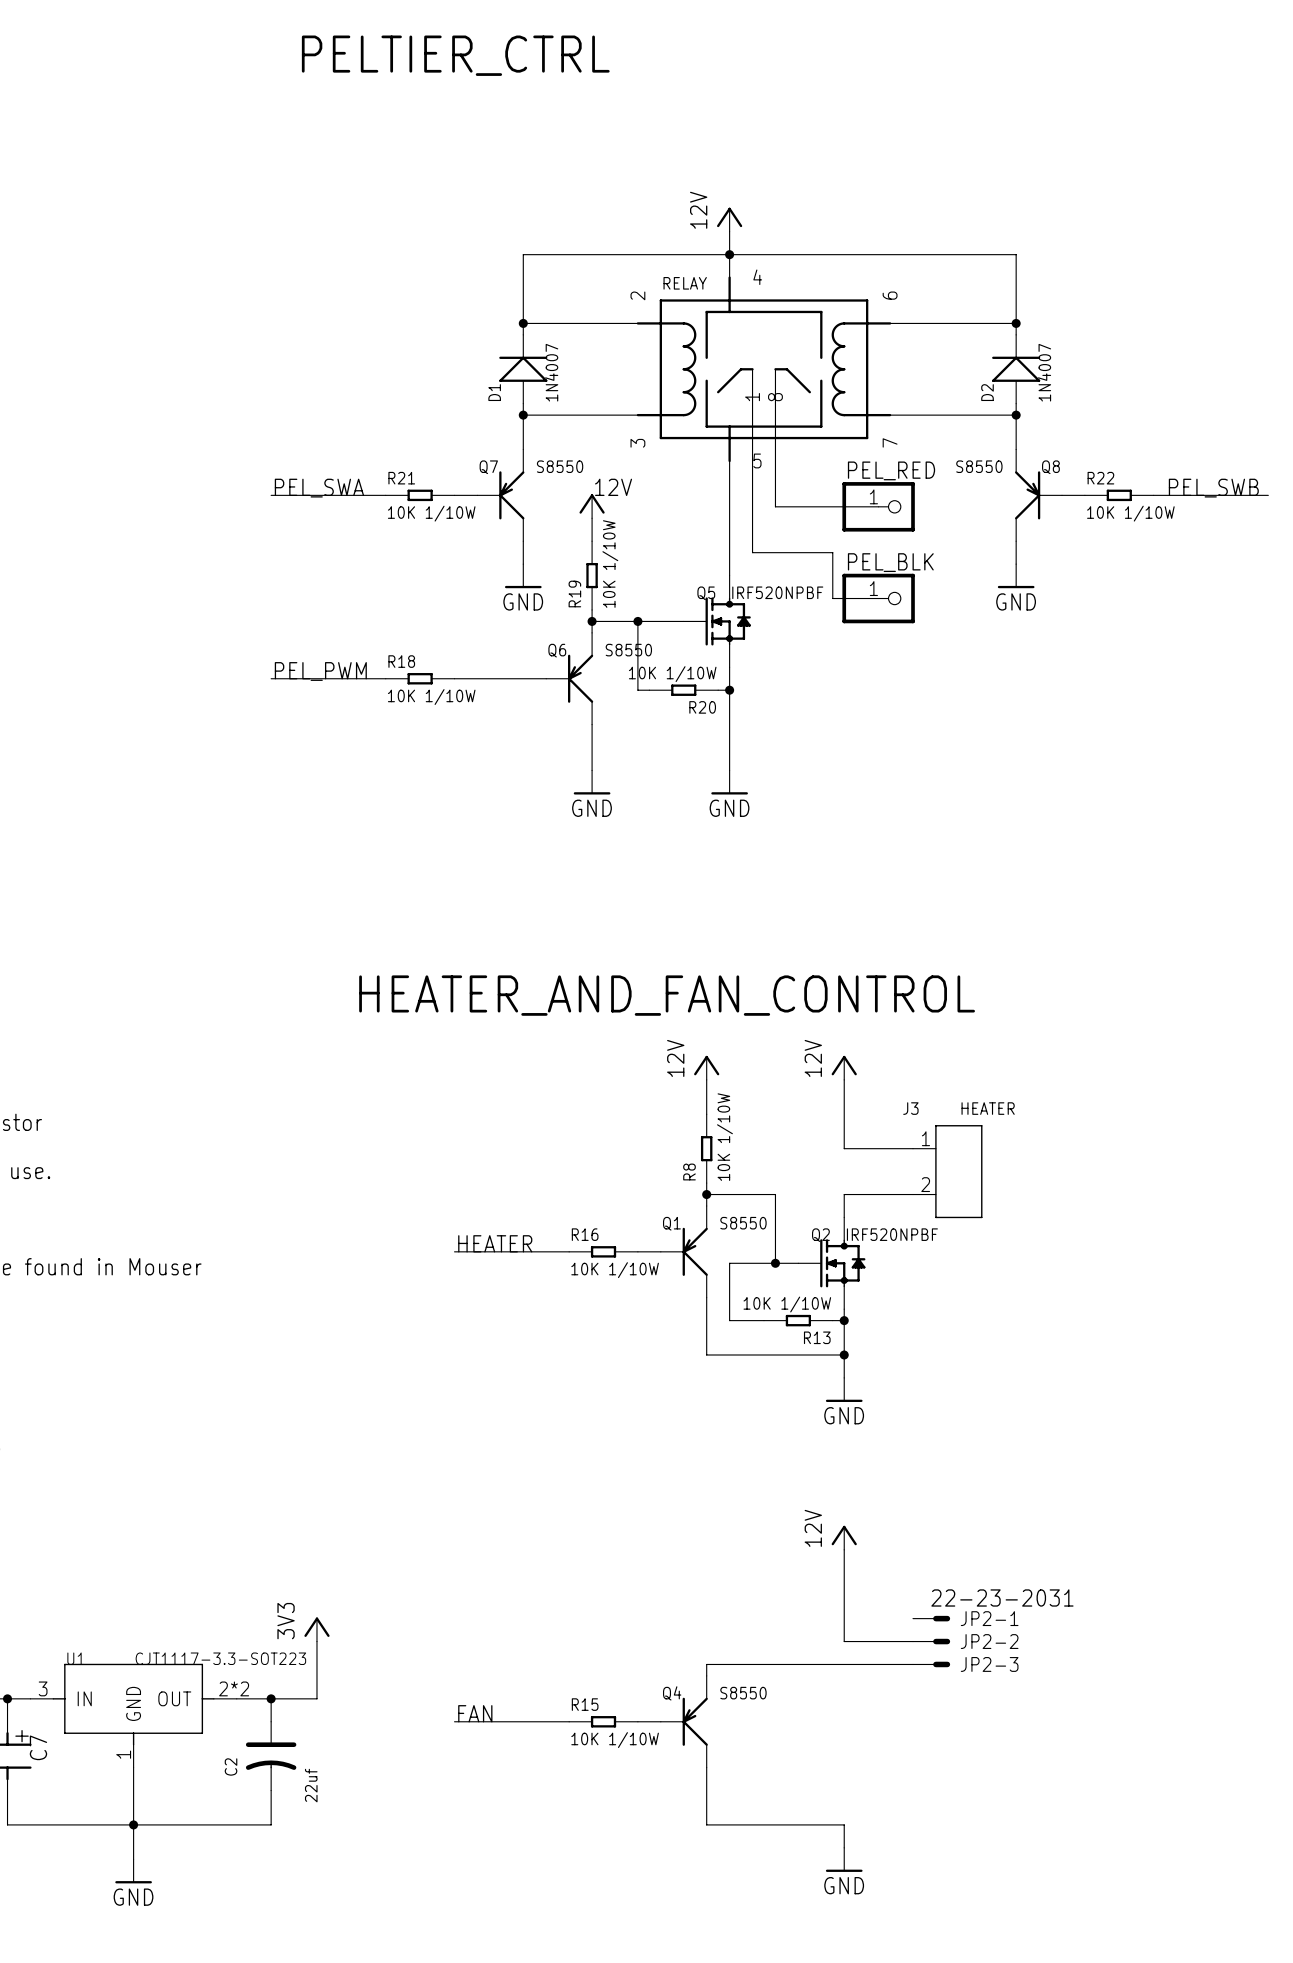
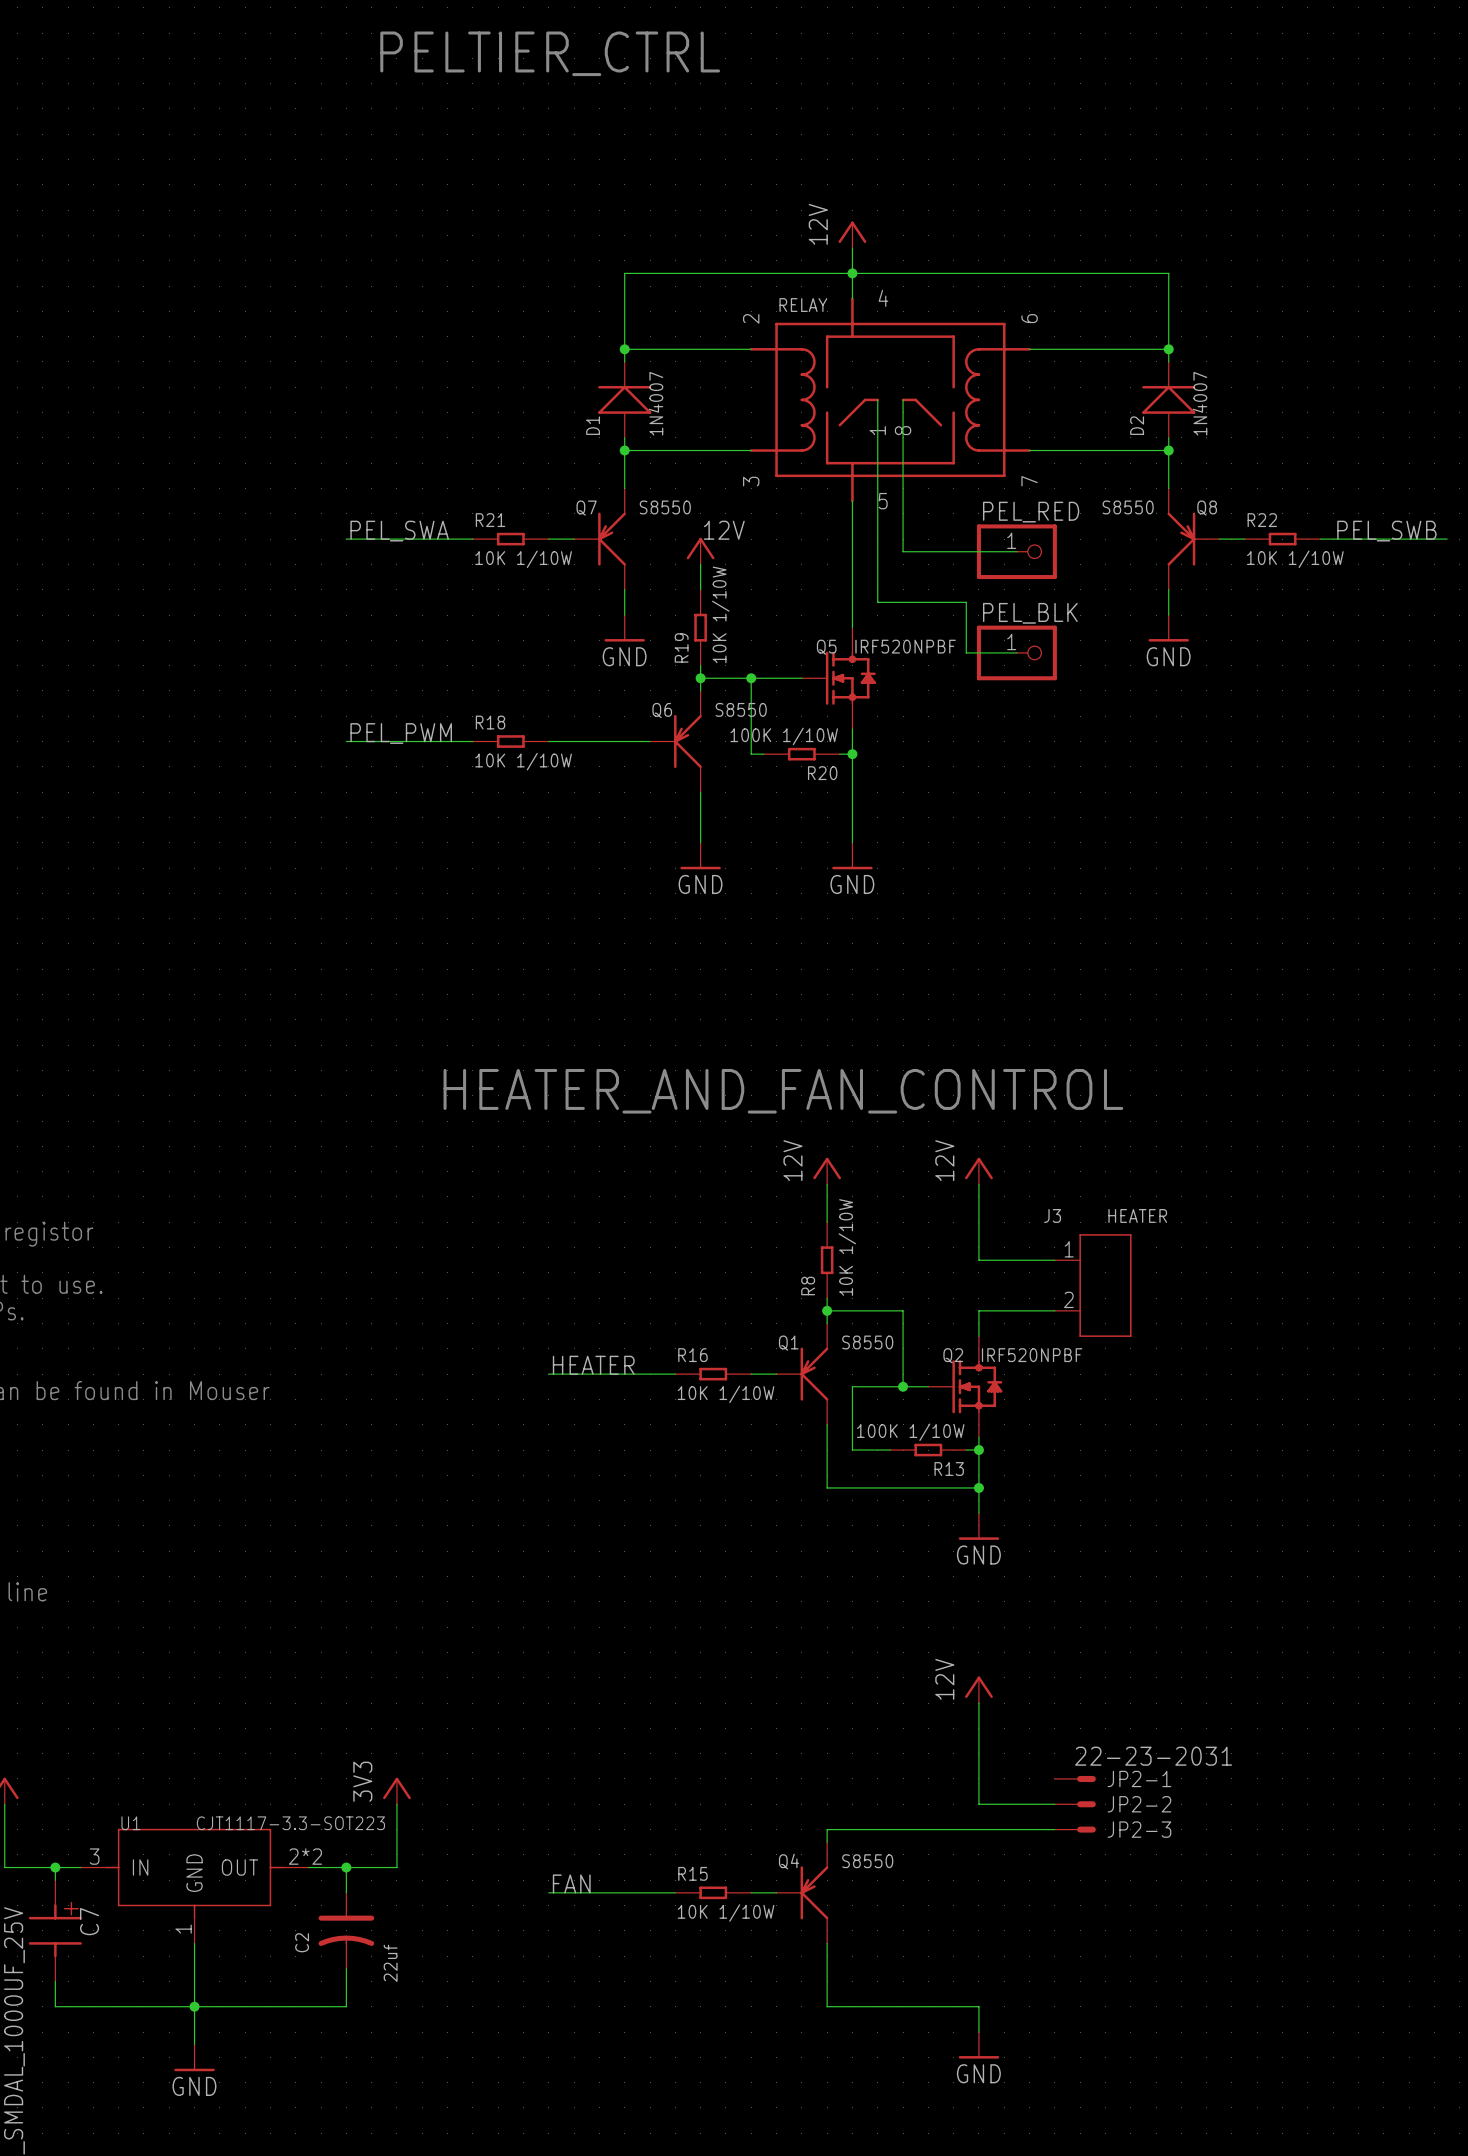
R20 value: 10K 1/10W (672, 674) -> 100K 1/10W (784, 736)
R13 value: 10K 1/10W (787, 1304) -> 100K 1/10W (910, 1432)

